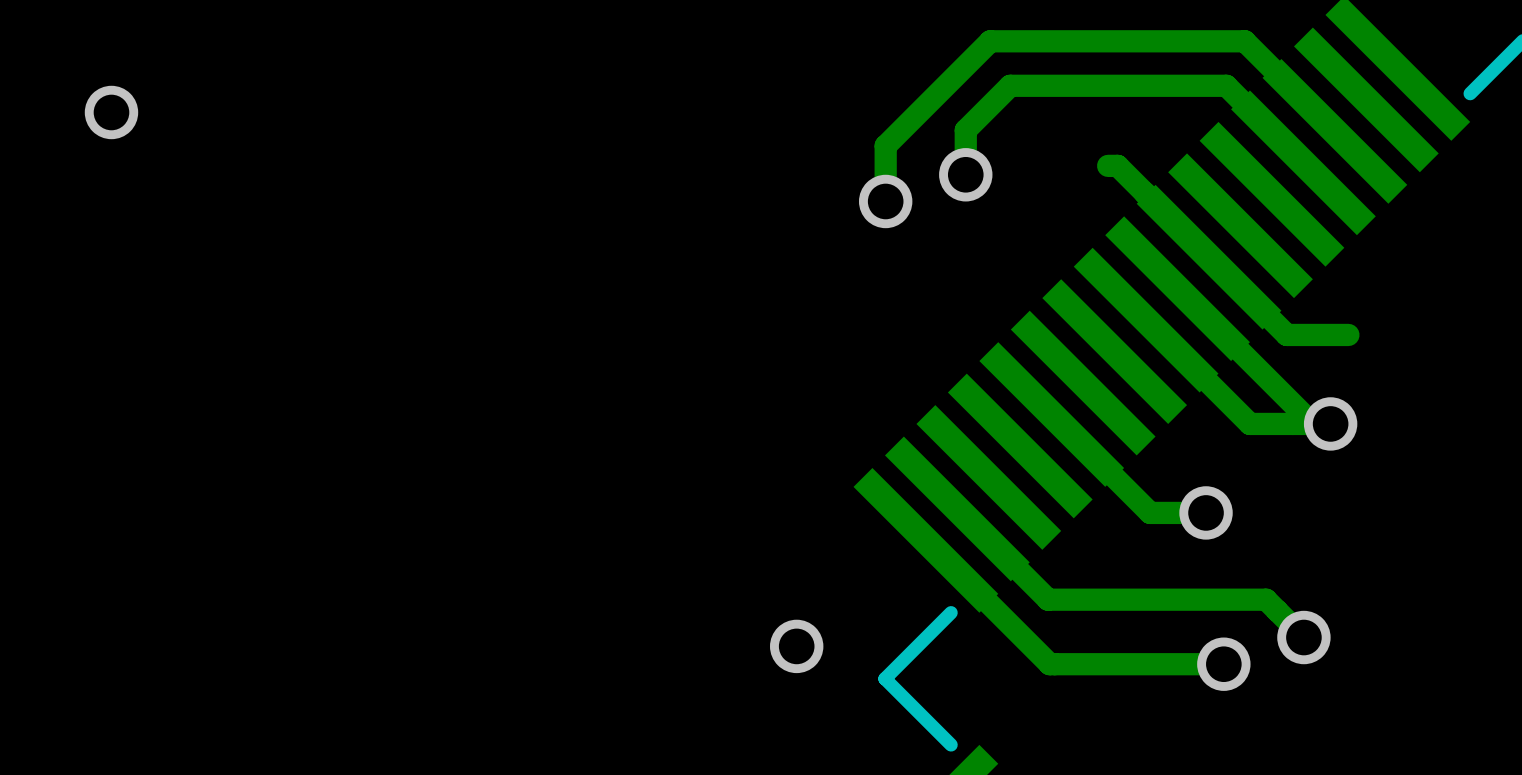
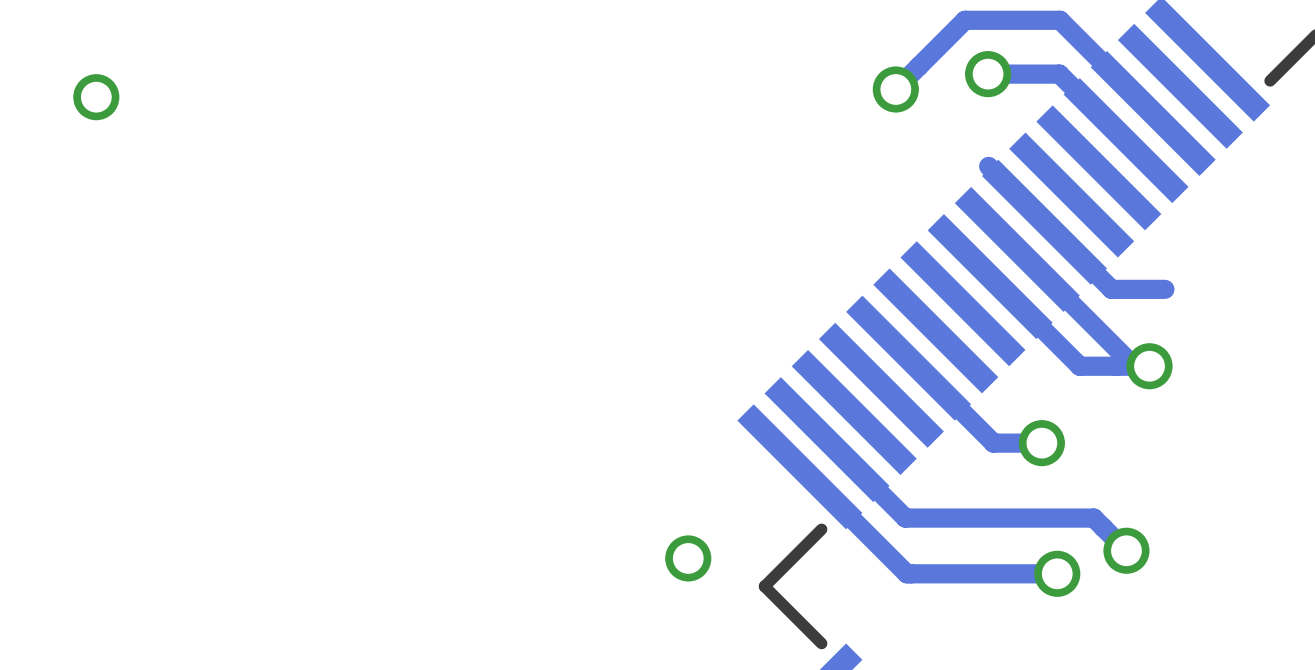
track: (1244, 41) (990, 41) (885, 145) (885, 201) -> (1075, 35) (1060, 20) (965, 20) (895, 89)
track: (1143, 85) (1010, 85) (965, 130) (965, 174) -> none
via: none -> (988, 74)
via: none -> (895, 89)
track: (1108, 165) (1117, 165) (1144, 192) -> none
via: (965, 174) -> none
via: (885, 201) -> none

